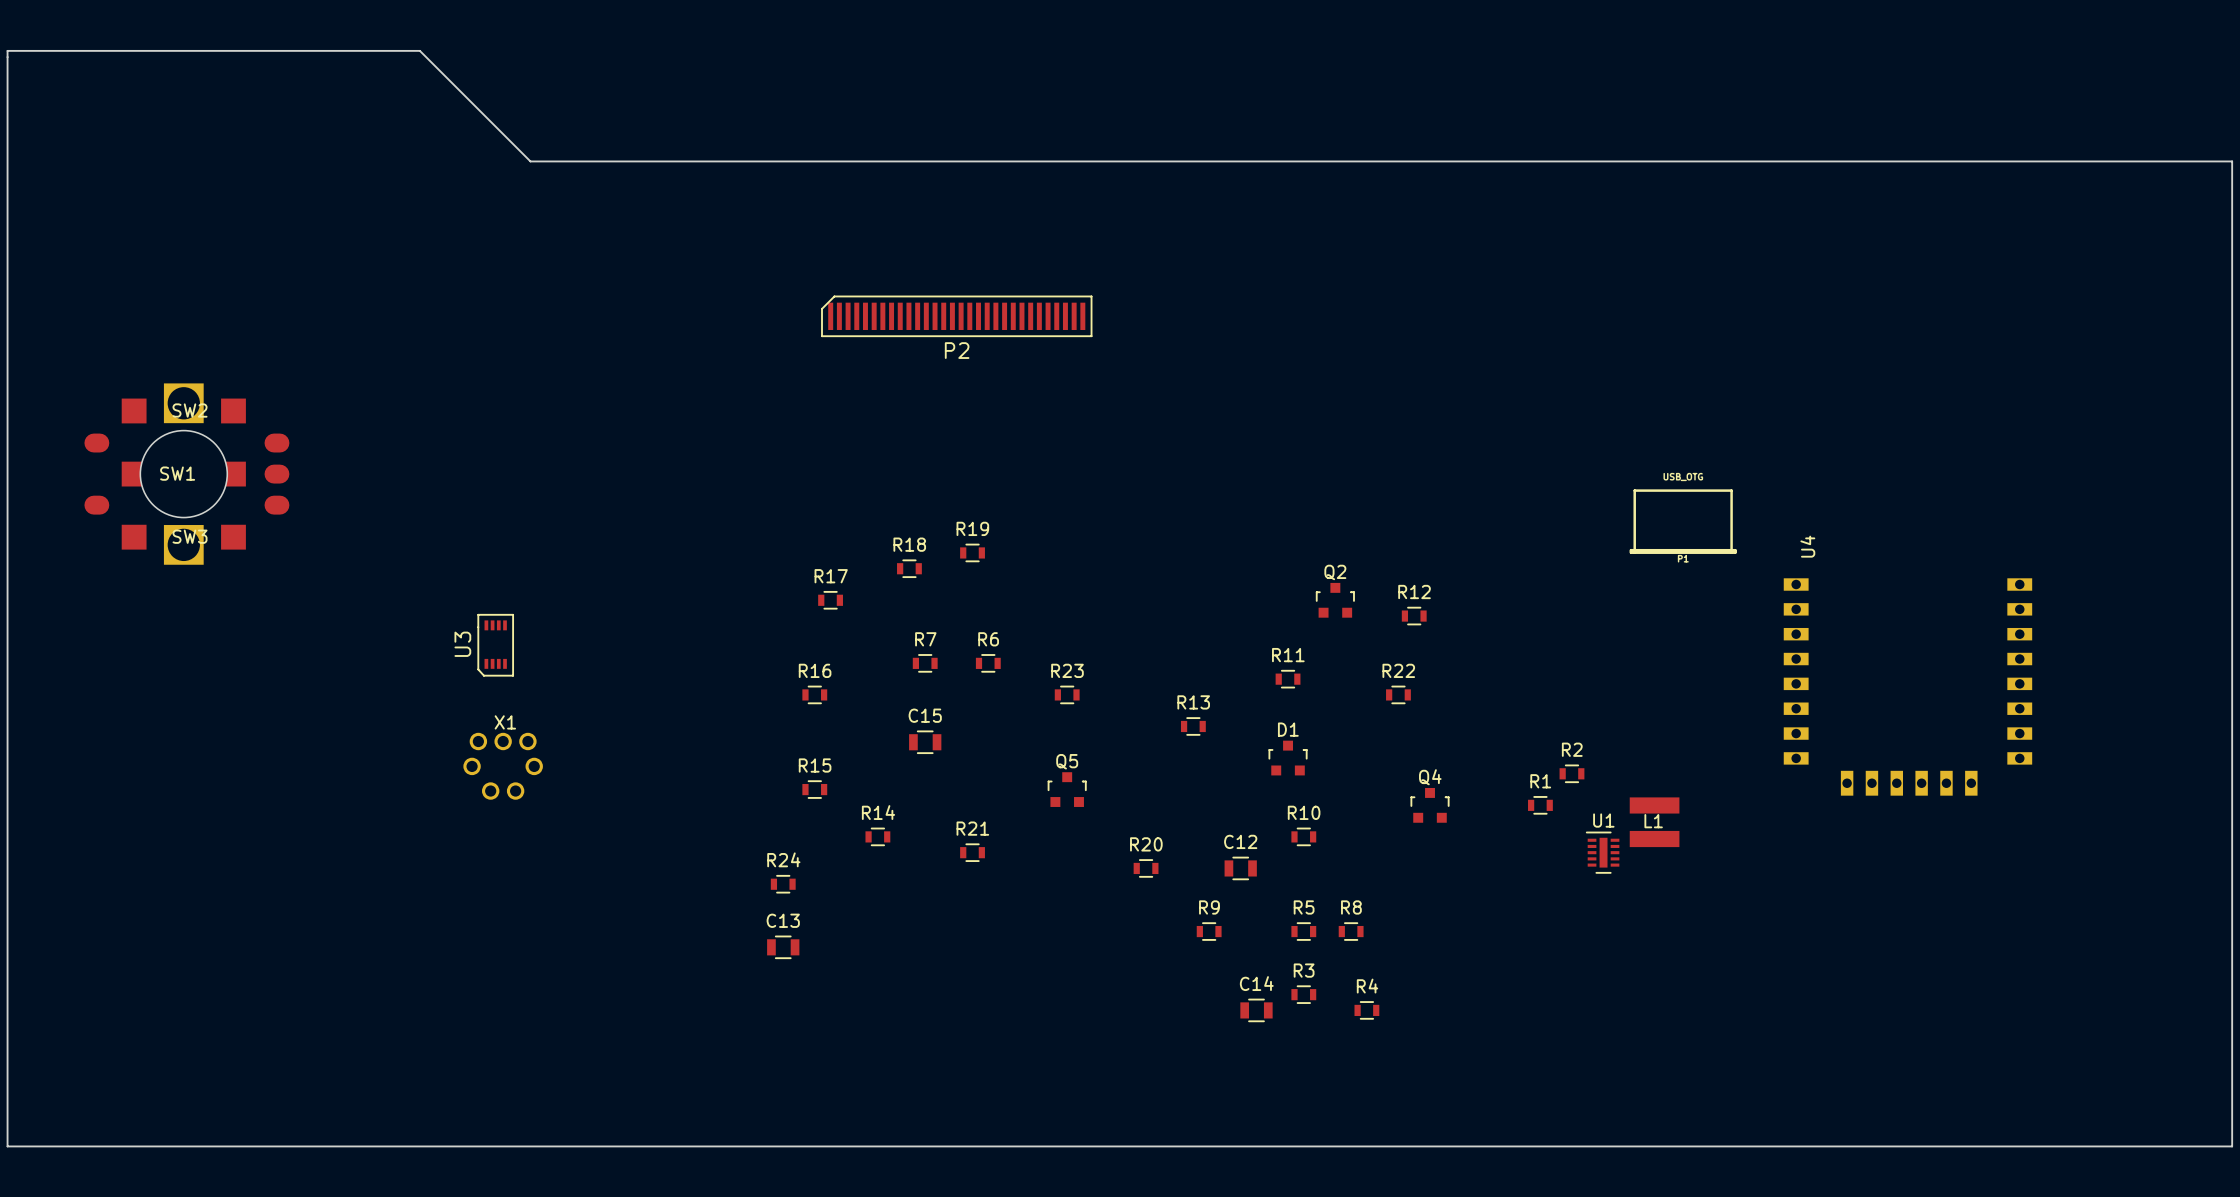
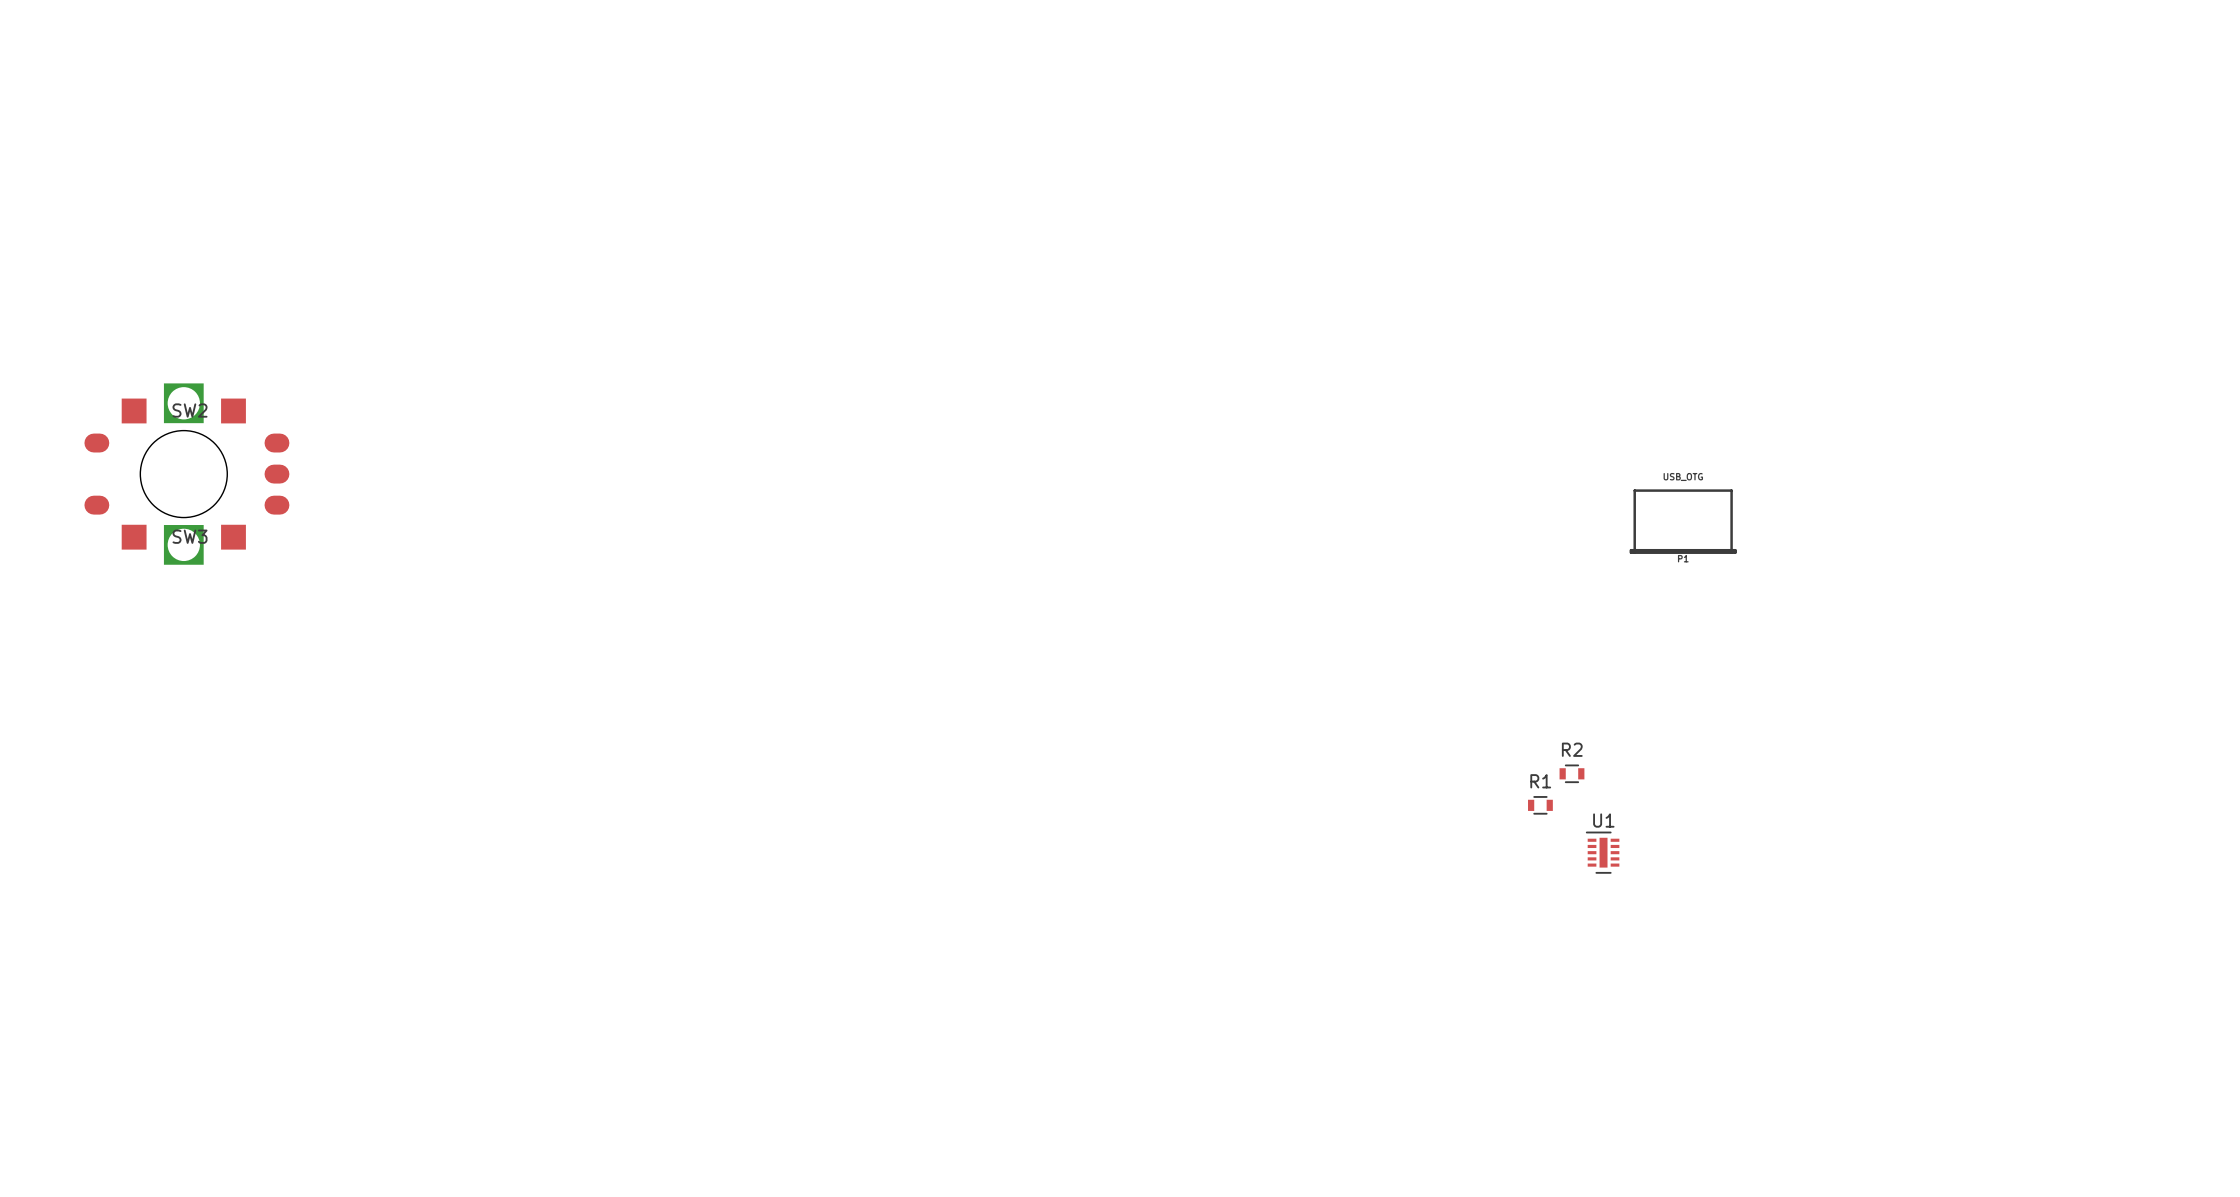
board edge: (7, 50) (7, 1146) (2232, 1146) (2232, 161) (530, 161) (419, 50) (7, 50) -> none
P2: (956, 316) -> none
SW1: (183, 474) -> none
R19: (972, 552) -> none
R18: (909, 568) -> none
R17: (830, 600) -> none
Q2: (1335, 600) -> none
R12: (1414, 616) -> none
U3: (495, 645) -> none
R7: (925, 663) -> none
R6: (988, 663) -> none
R11: (1288, 679) -> none
U4: (1907, 686) -> none
R16: (814, 694) -> none
R23: (1067, 694) -> none
R22: (1398, 694) -> none
R13: (1193, 726) -> none
C15: (925, 742) -> none
D1: (1288, 758) -> none
X1: (503, 766) -> none
R15: (814, 789) -> none
Q5: (1067, 789) -> none
Q4: (1430, 805) -> none
L1: (1654, 822) -> none
R14: (877, 836) -> none
R10: (1303, 836) -> none
R21: (972, 852) -> none
R20: (1146, 868) -> none
C12: (1240, 868) -> none
R24: (783, 884) -> none
R9: (1209, 931) -> none
R5: (1303, 931) -> none
R8: (1351, 931) -> none
C13: (783, 947) -> none
R3: (1303, 994) -> none
C14: (1256, 1010) -> none
R4: (1366, 1010) -> none

